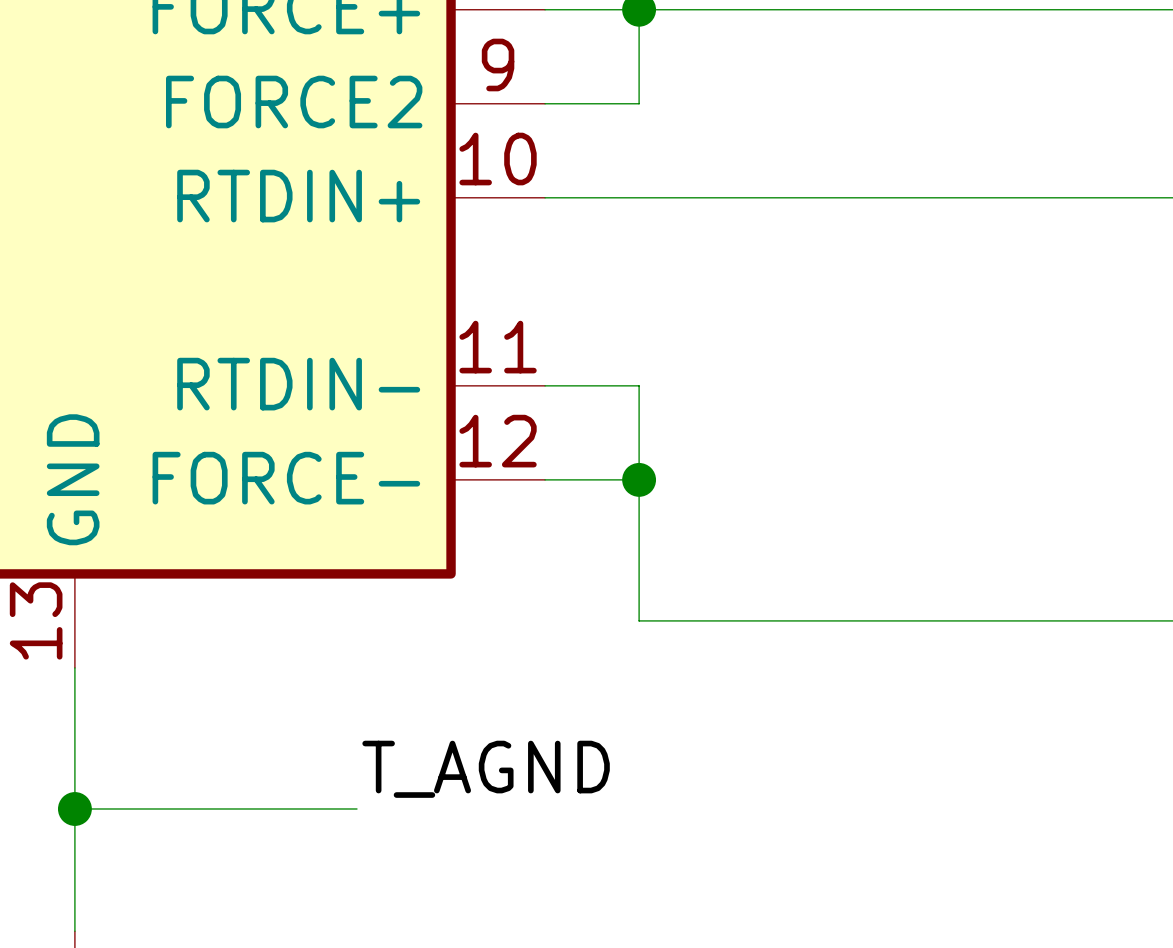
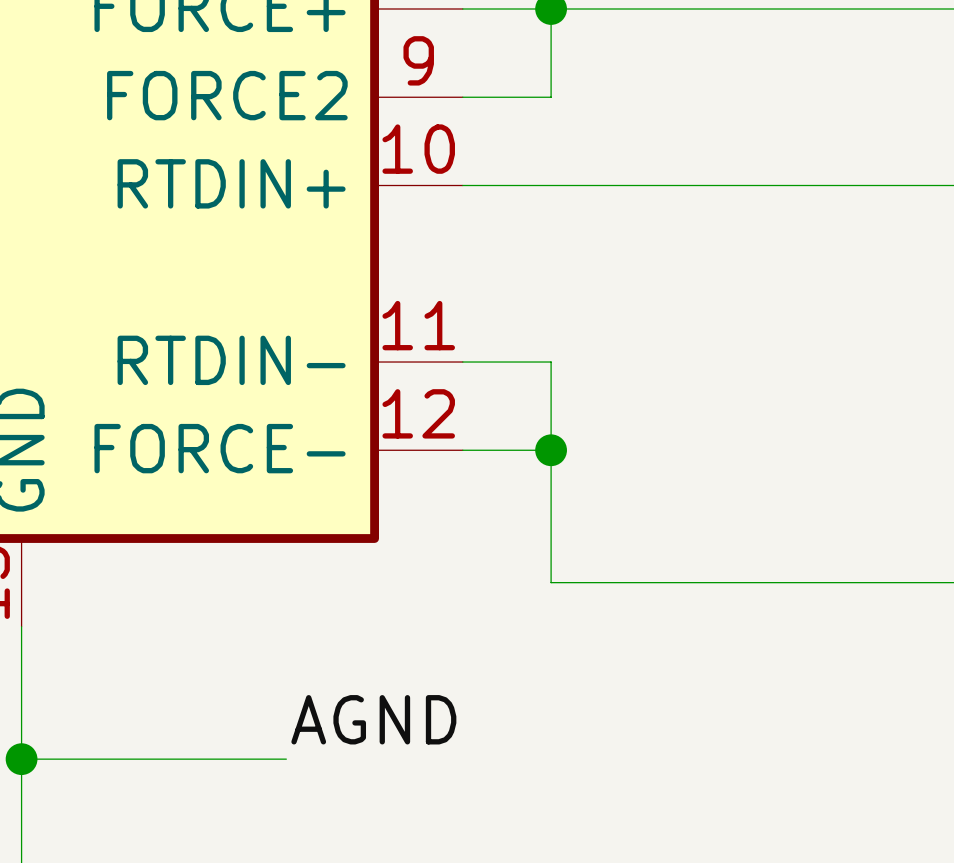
label: T_AGND (486, 769) -> AGND (373, 719)

